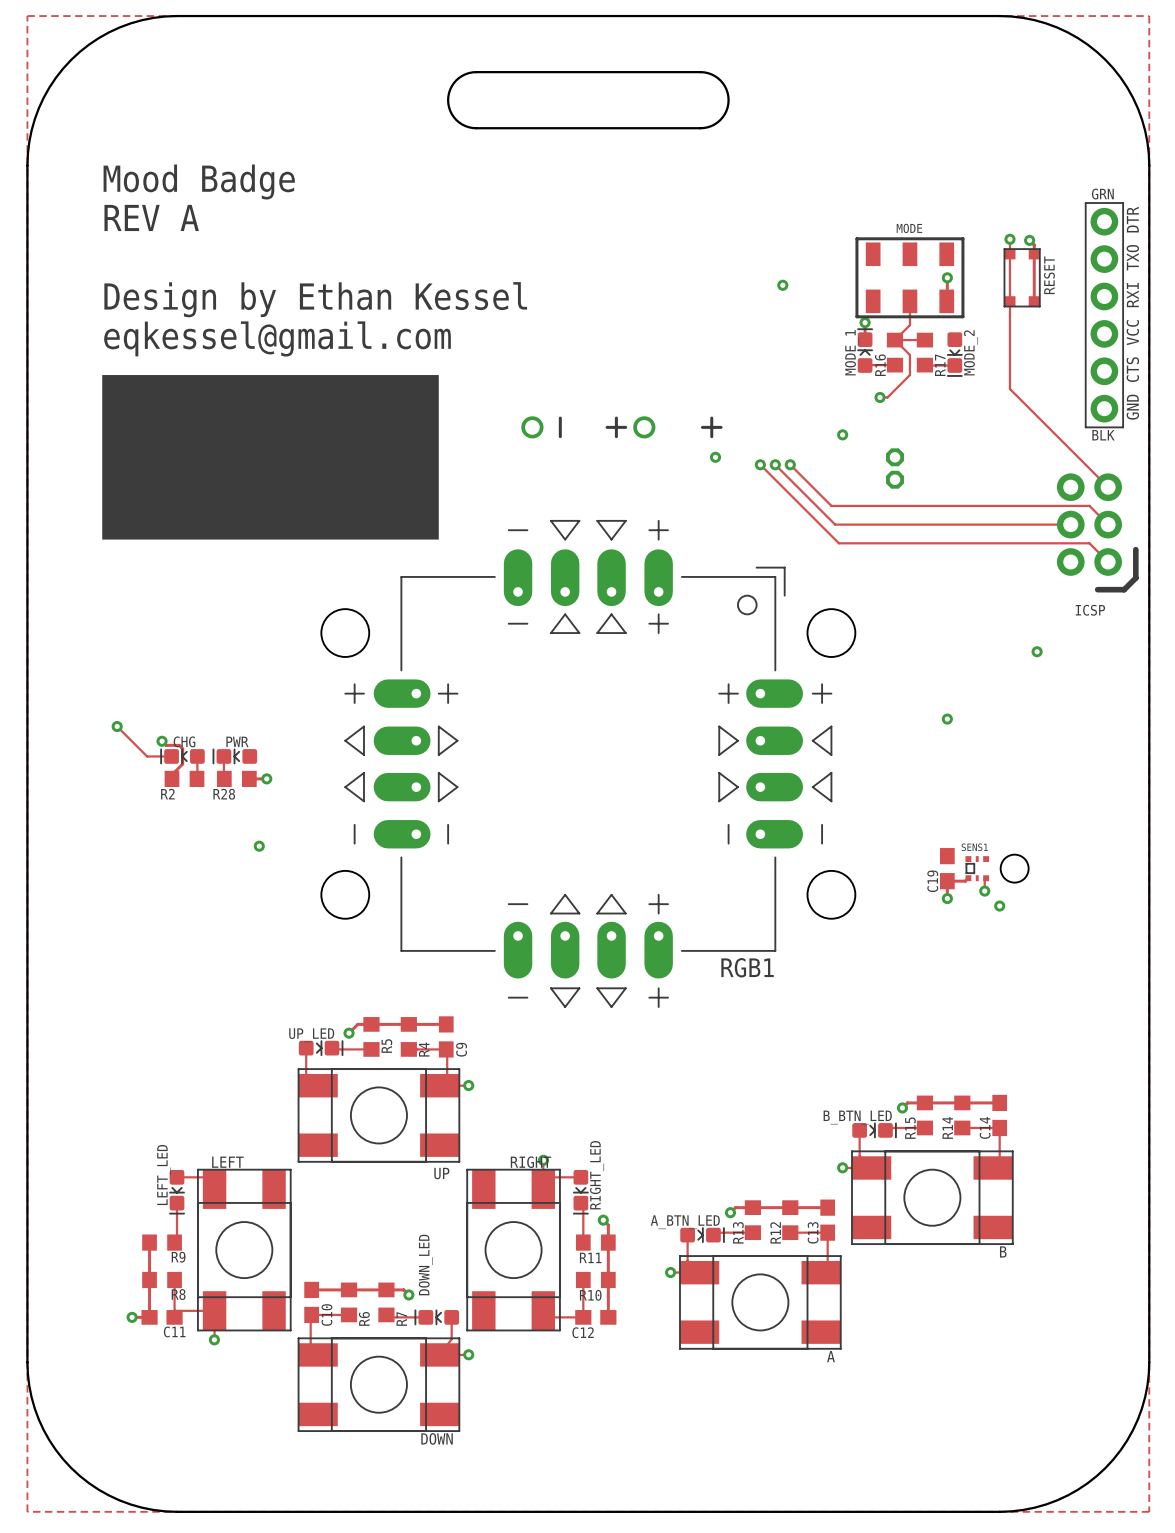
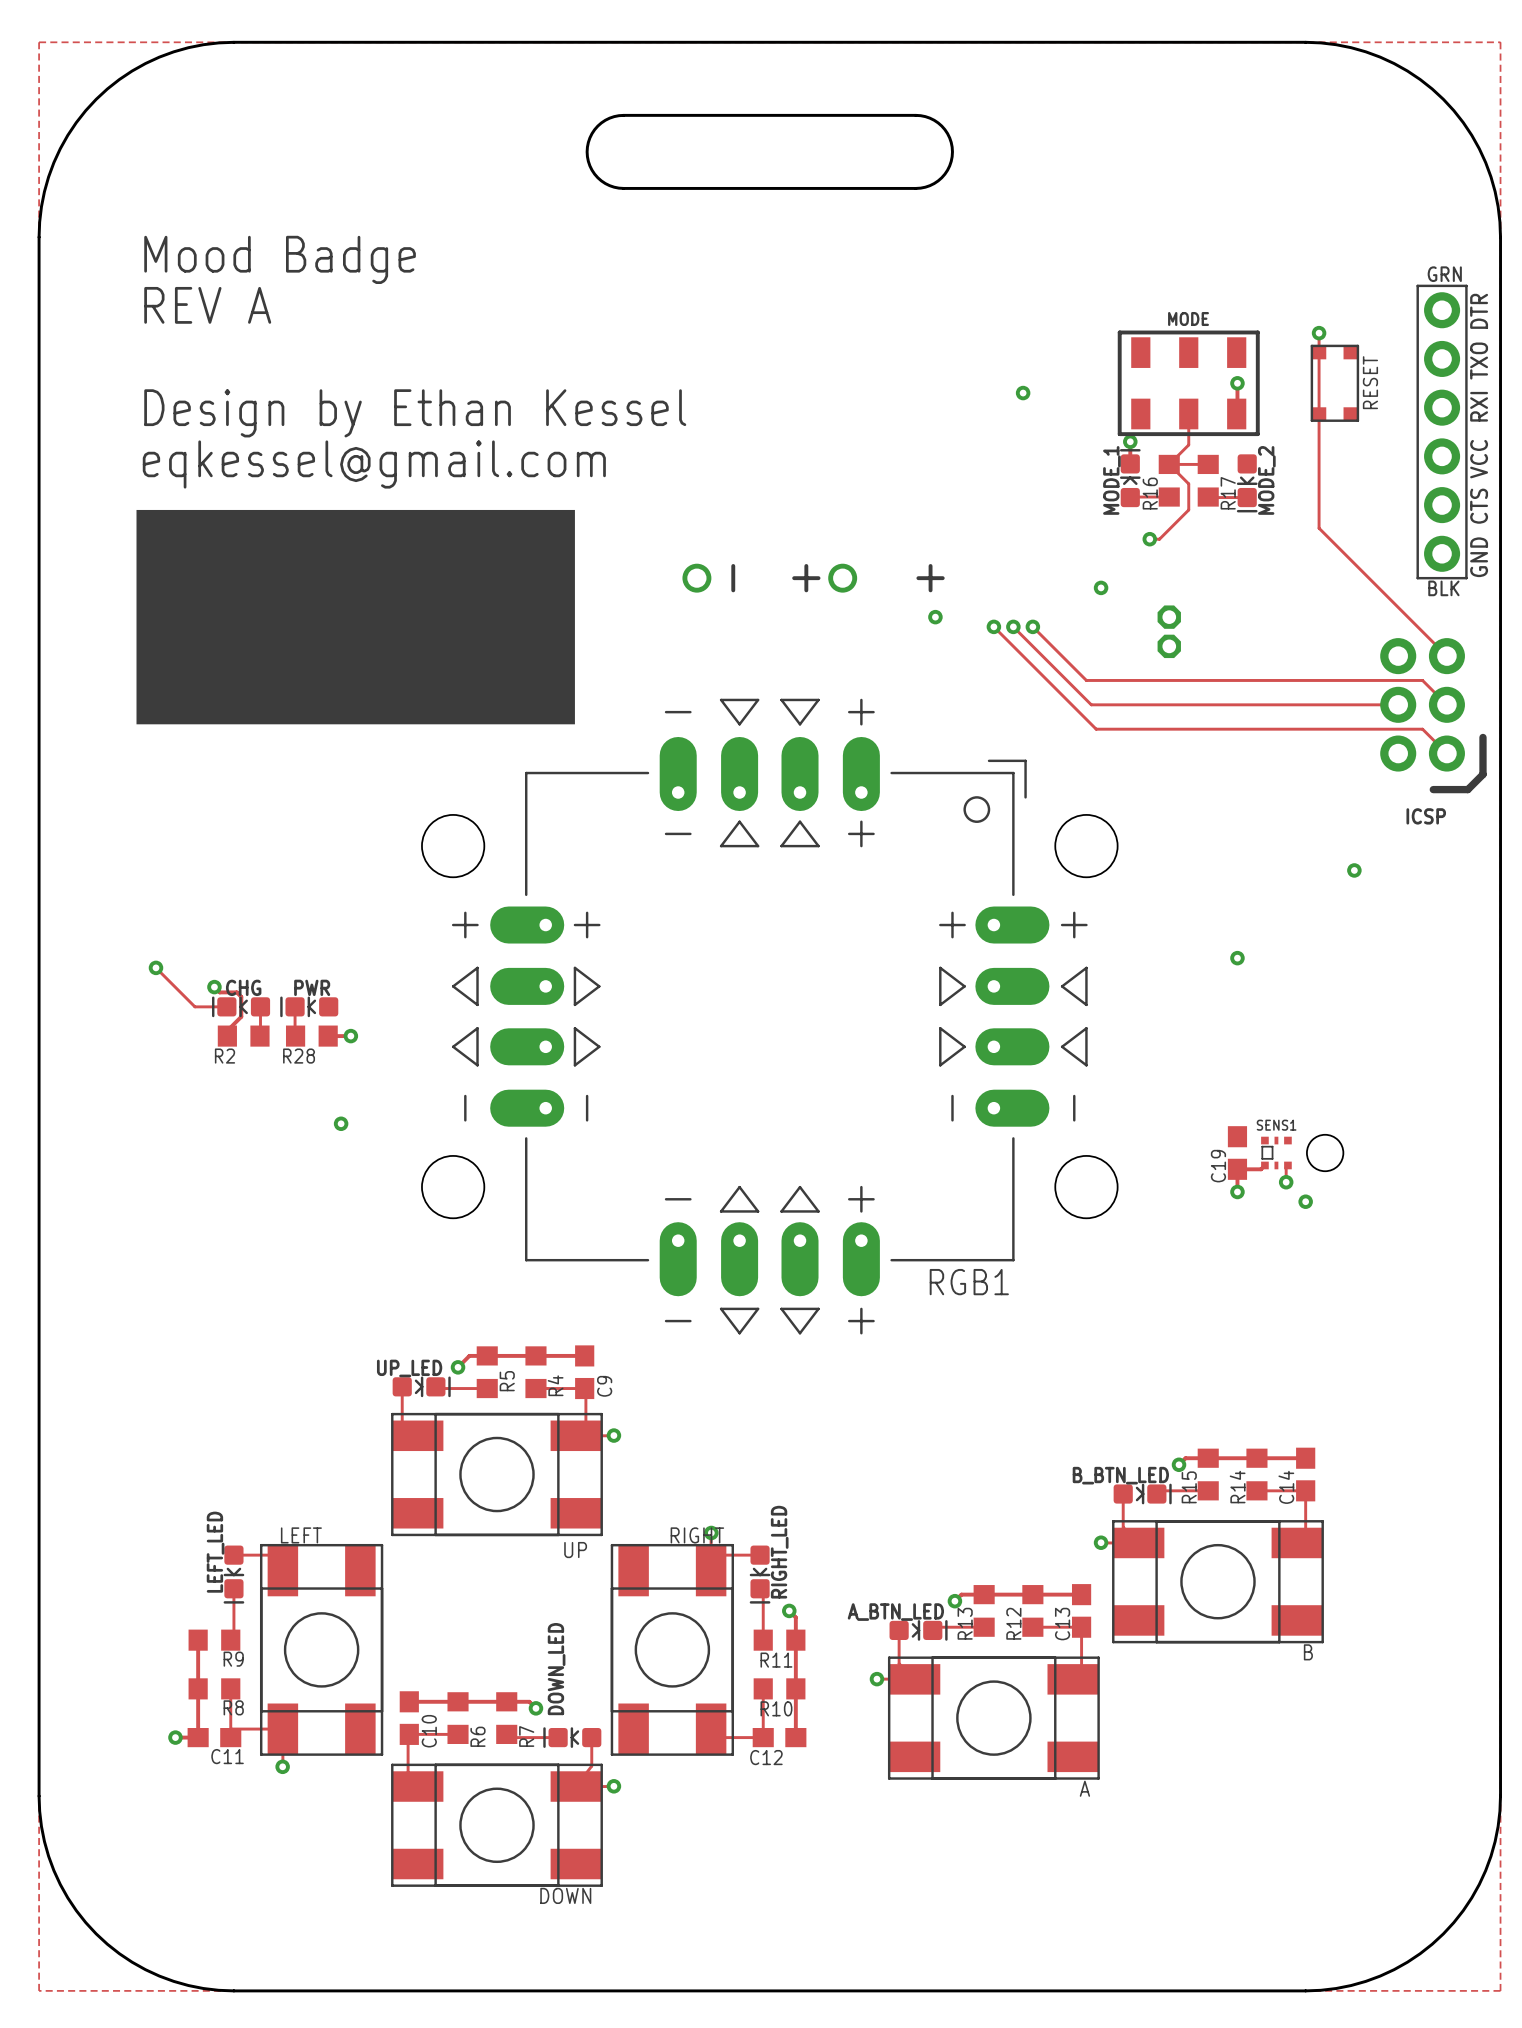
track: (1029, 240) (1034, 245) (1034, 301) -> none
via: (1029, 240) -> none

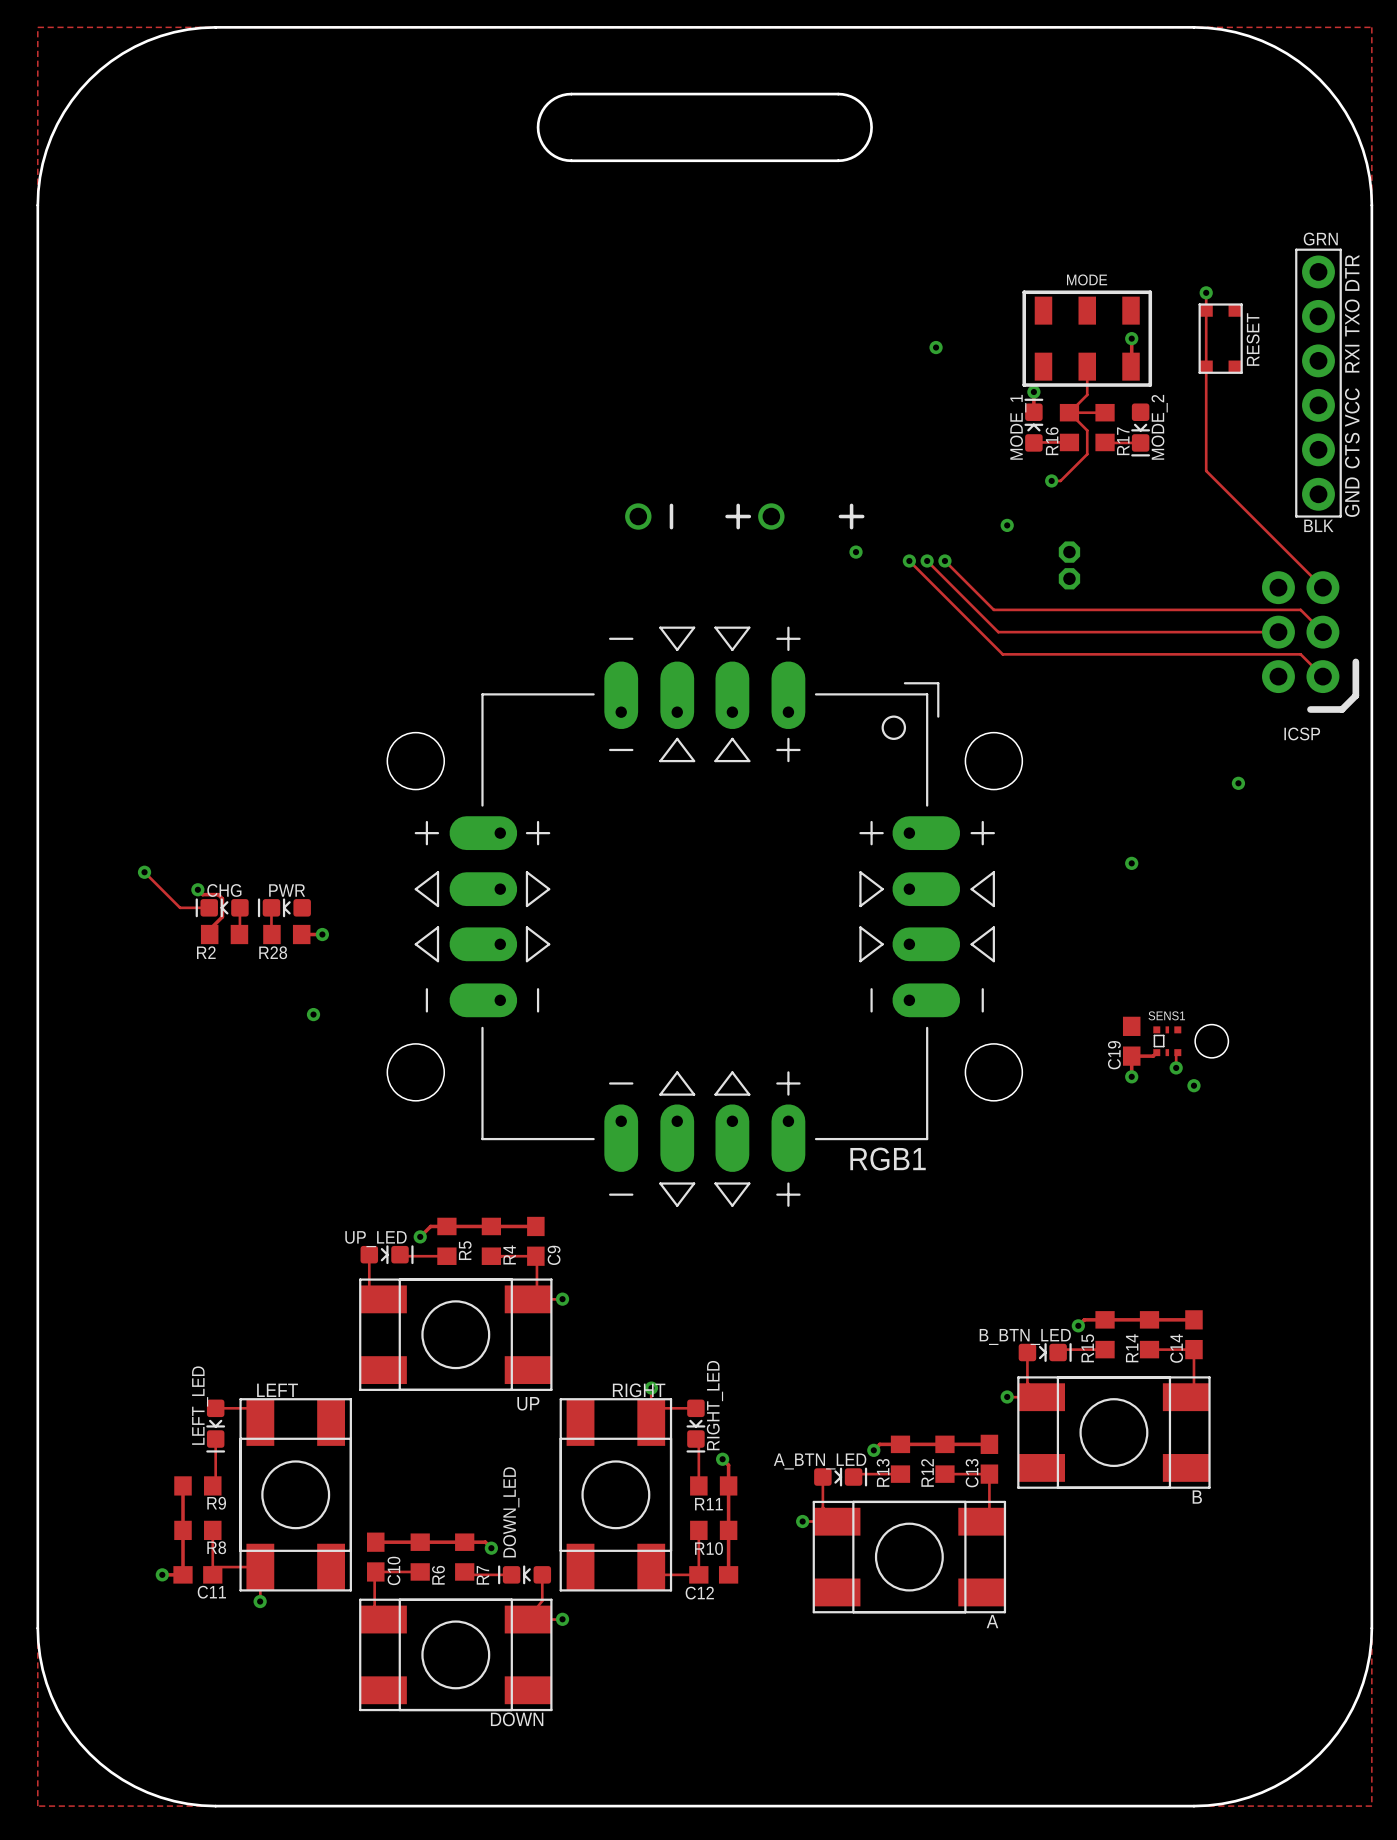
text: Mood Badge (280, 259) -> none
text: REV A (207, 305) -> none
text: Design by Ethan Kessel (415, 413) -> none
text: eqkessel@gmail.com (374, 464) -> none
drawing: [136, 509, 575, 725] -> none

